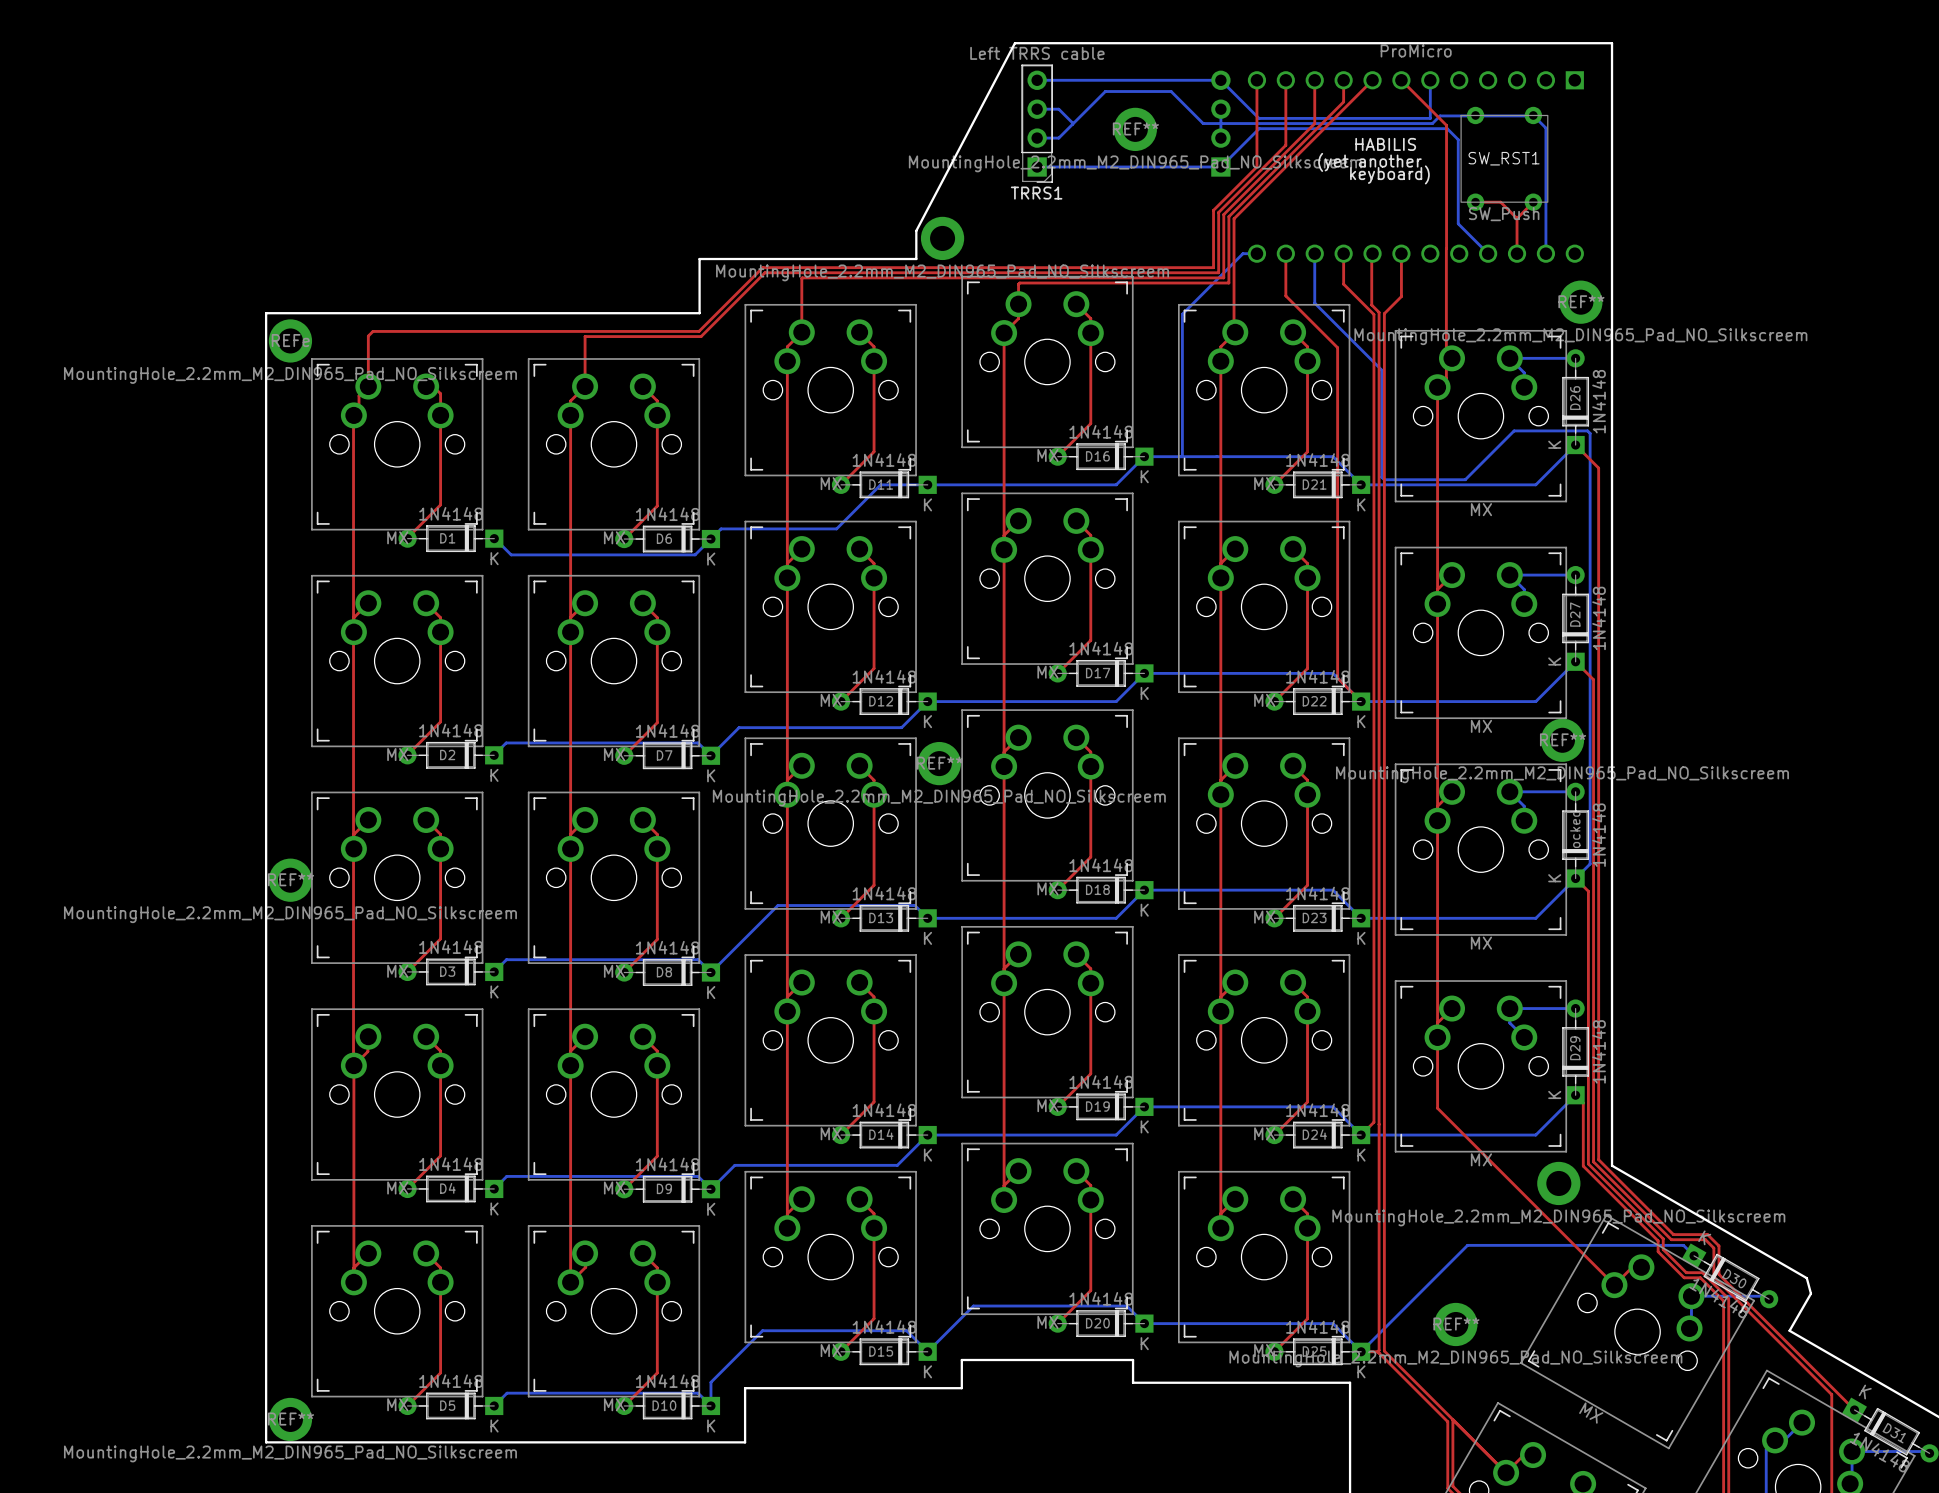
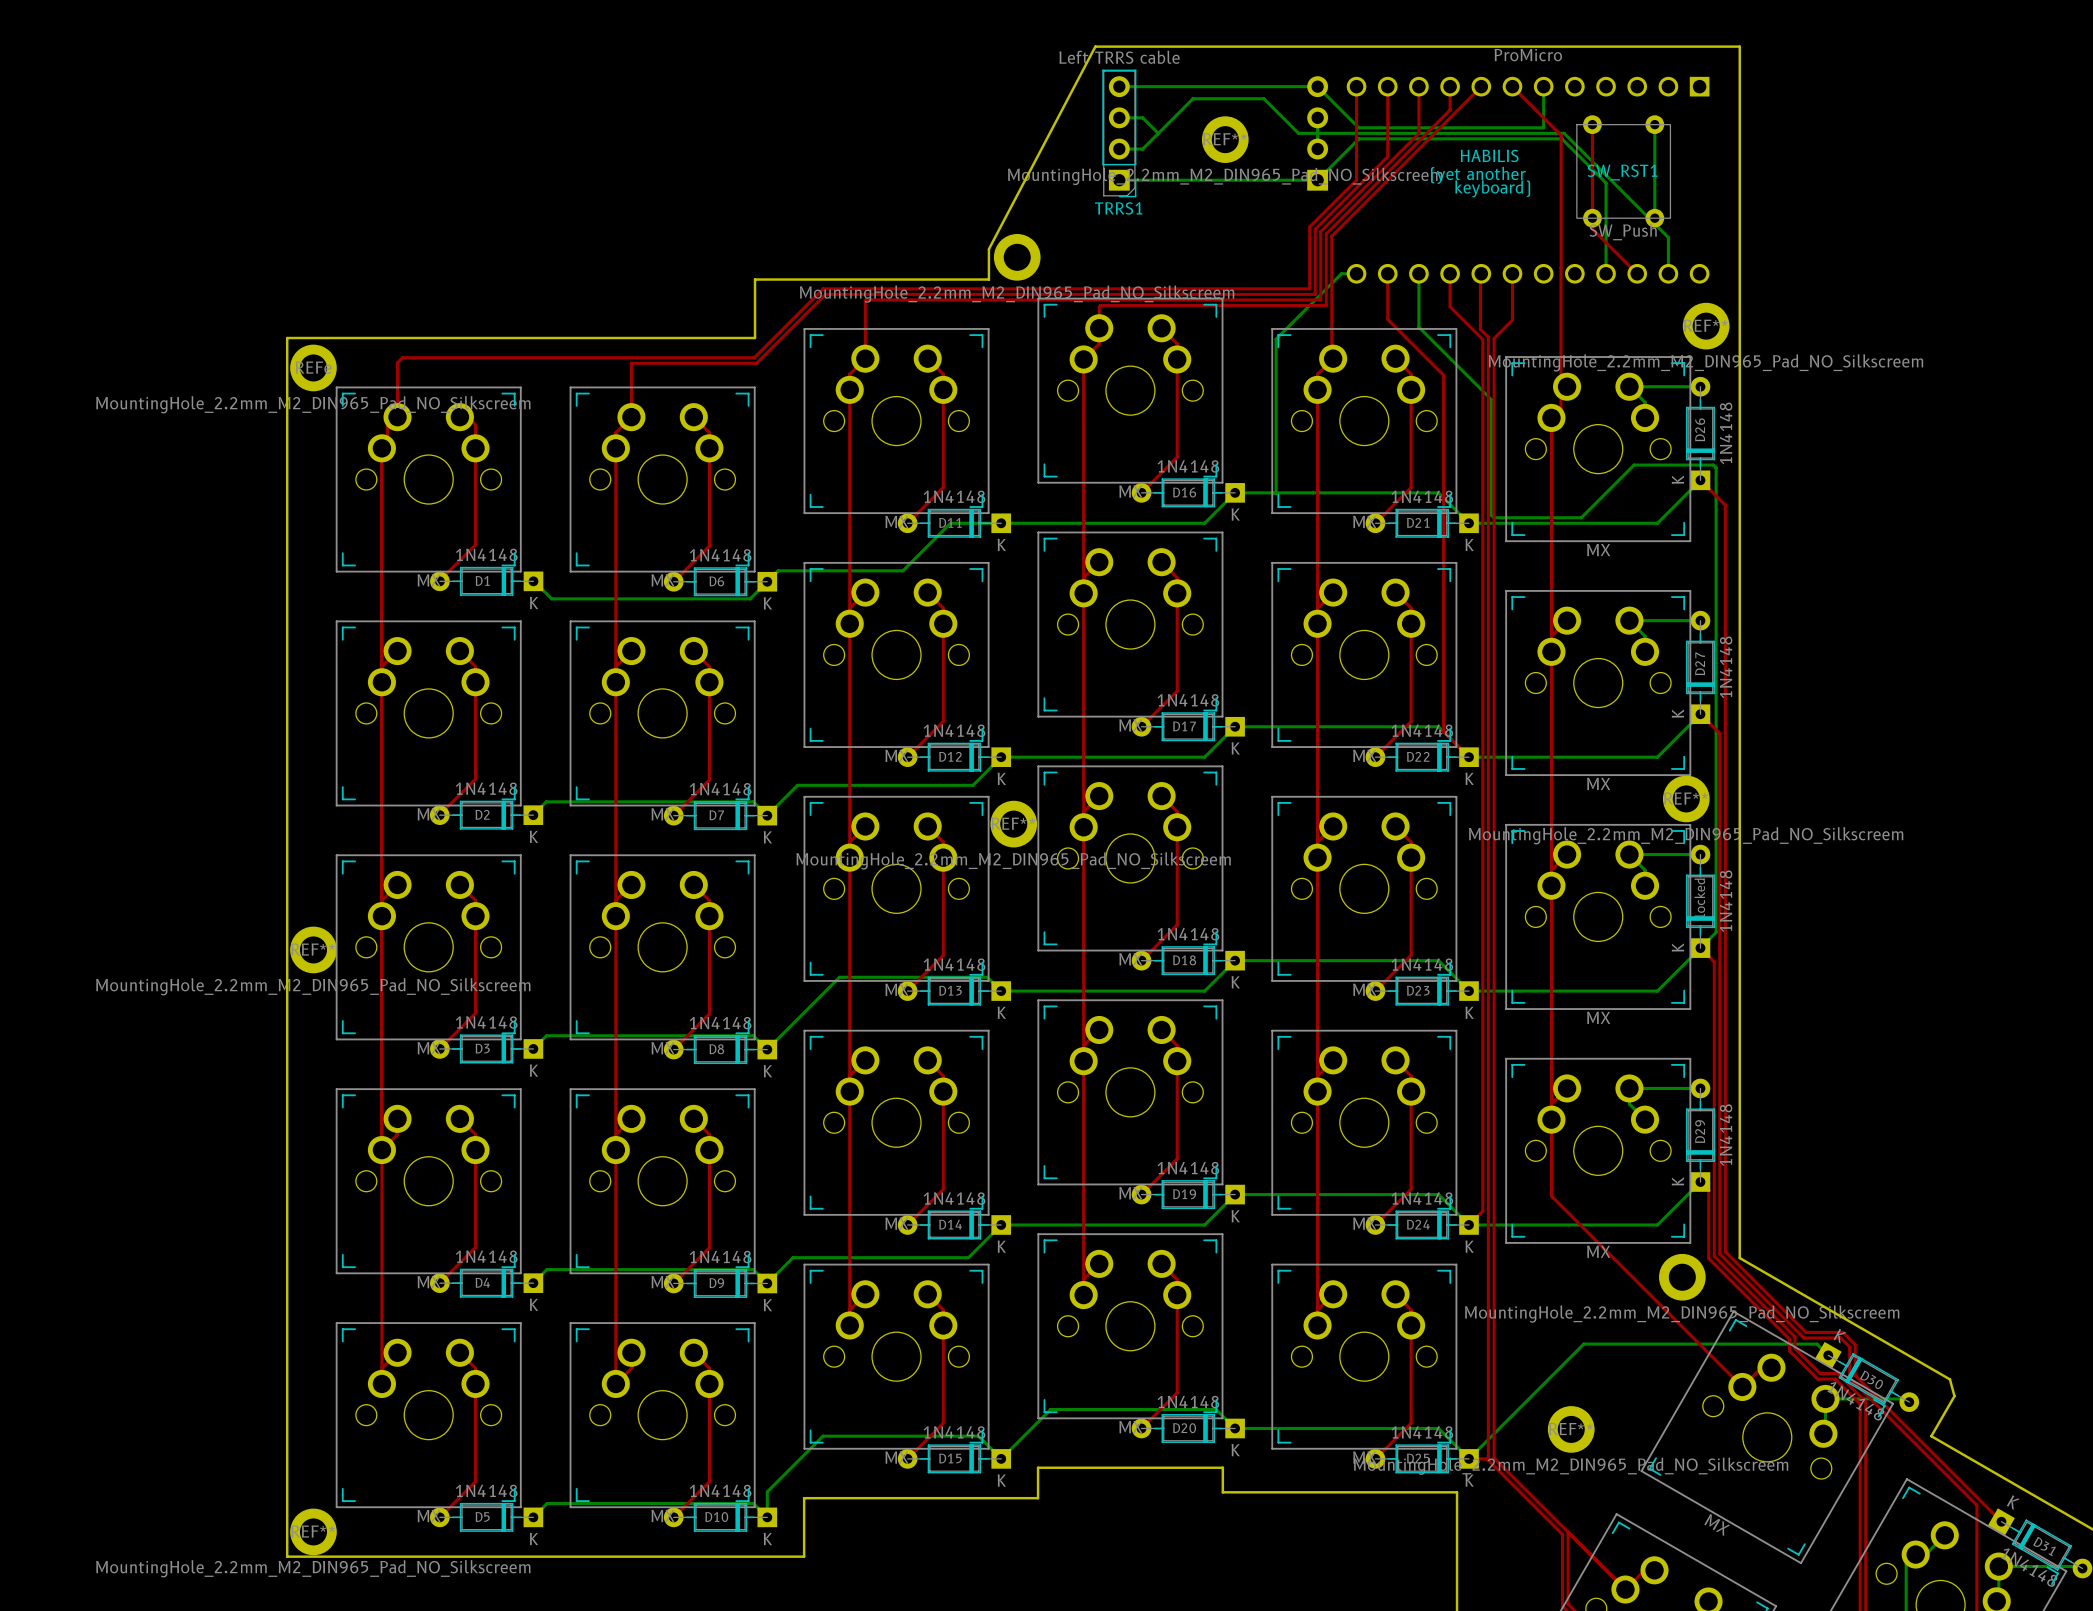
bottom track: none -> (1654, 124) (1654, 218)
bottom track: (1432, 123) (1440, 115) (1533, 115) (1545, 128) (1545, 220) -> (1545, 133) (1564, 133) (1668, 237)
bottom track: (1458, 139) (1458, 223) (1488, 253) -> (1573, 150) (1606, 183) (1606, 273)
top track: (1475, 202) (1500, 202) (1517, 218) -> none
top track: (1533, 202) (1517, 218) -> none
top track: (1517, 218) (1517, 253) -> (1592, 124) (1592, 229) (1637, 273)

